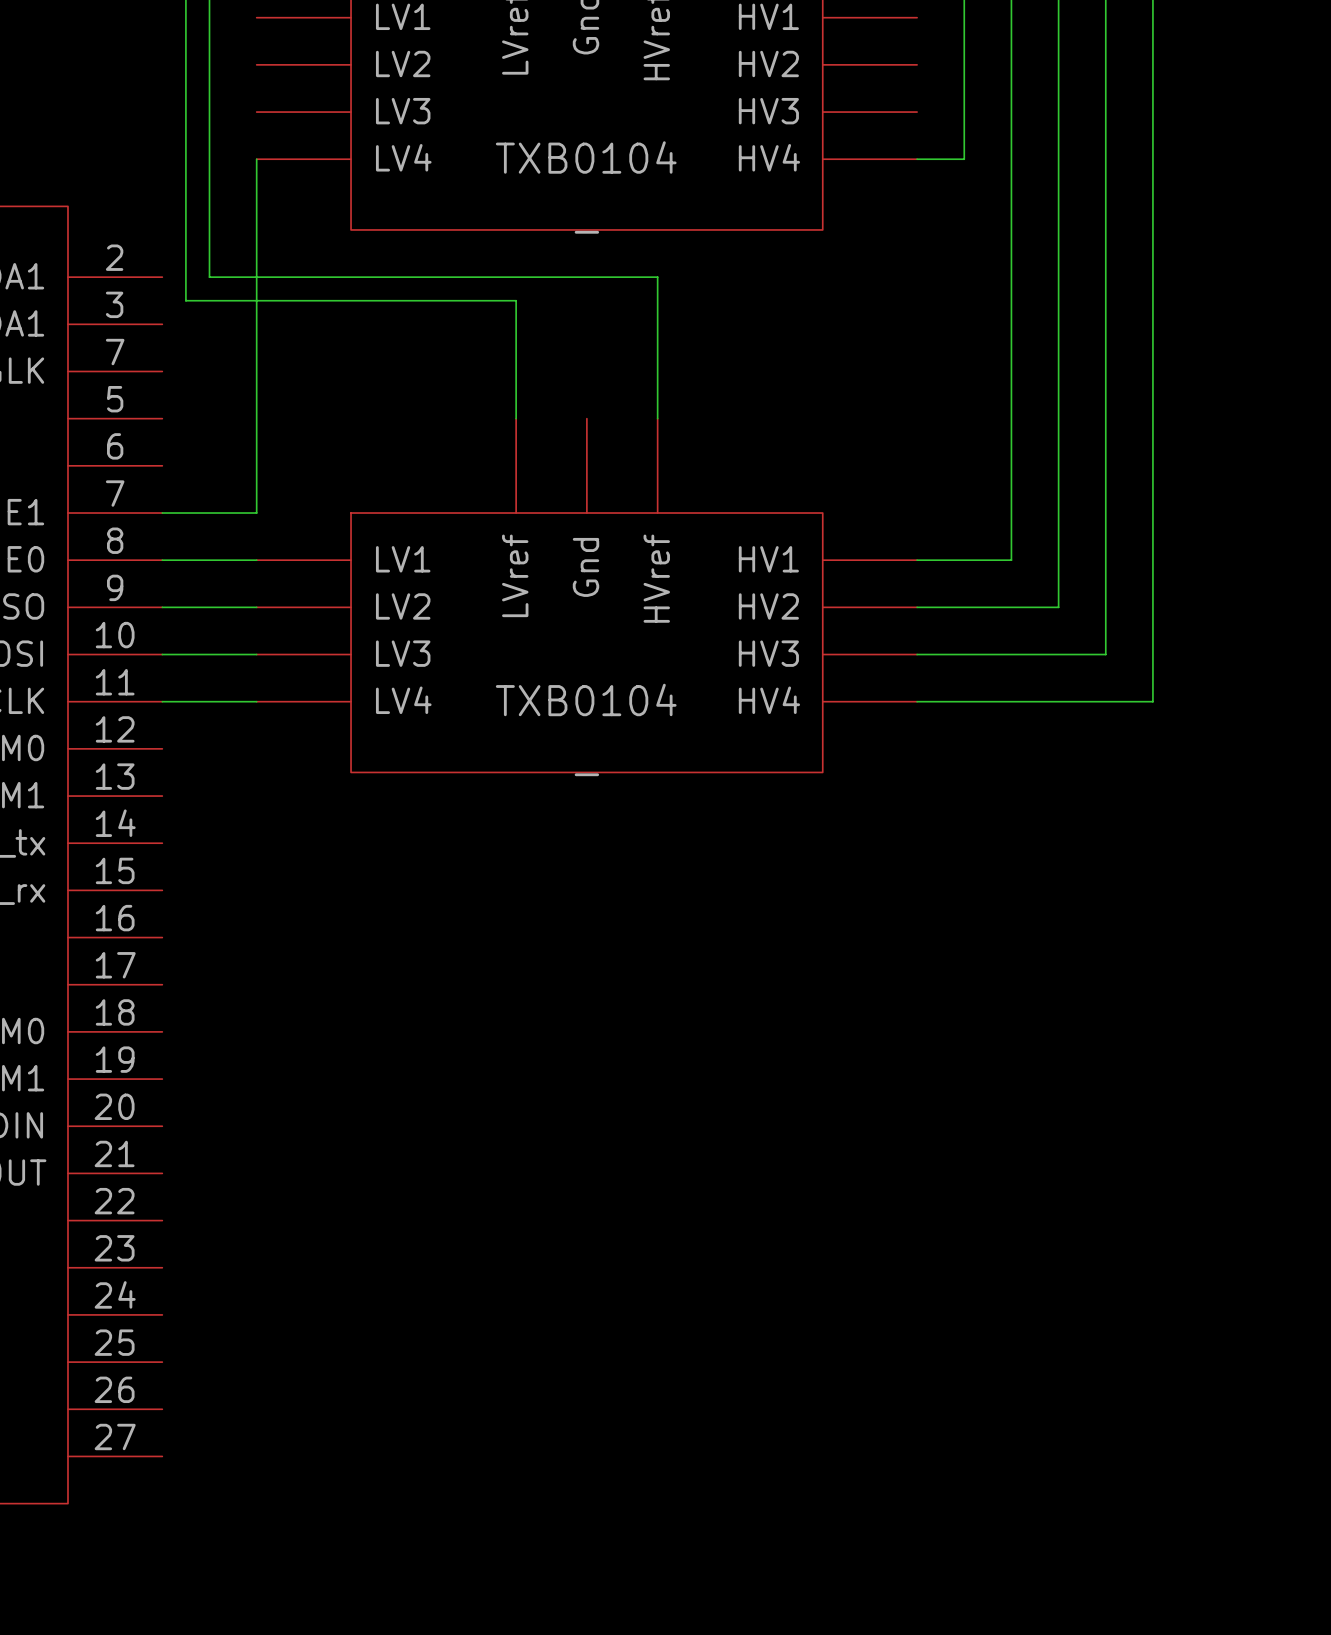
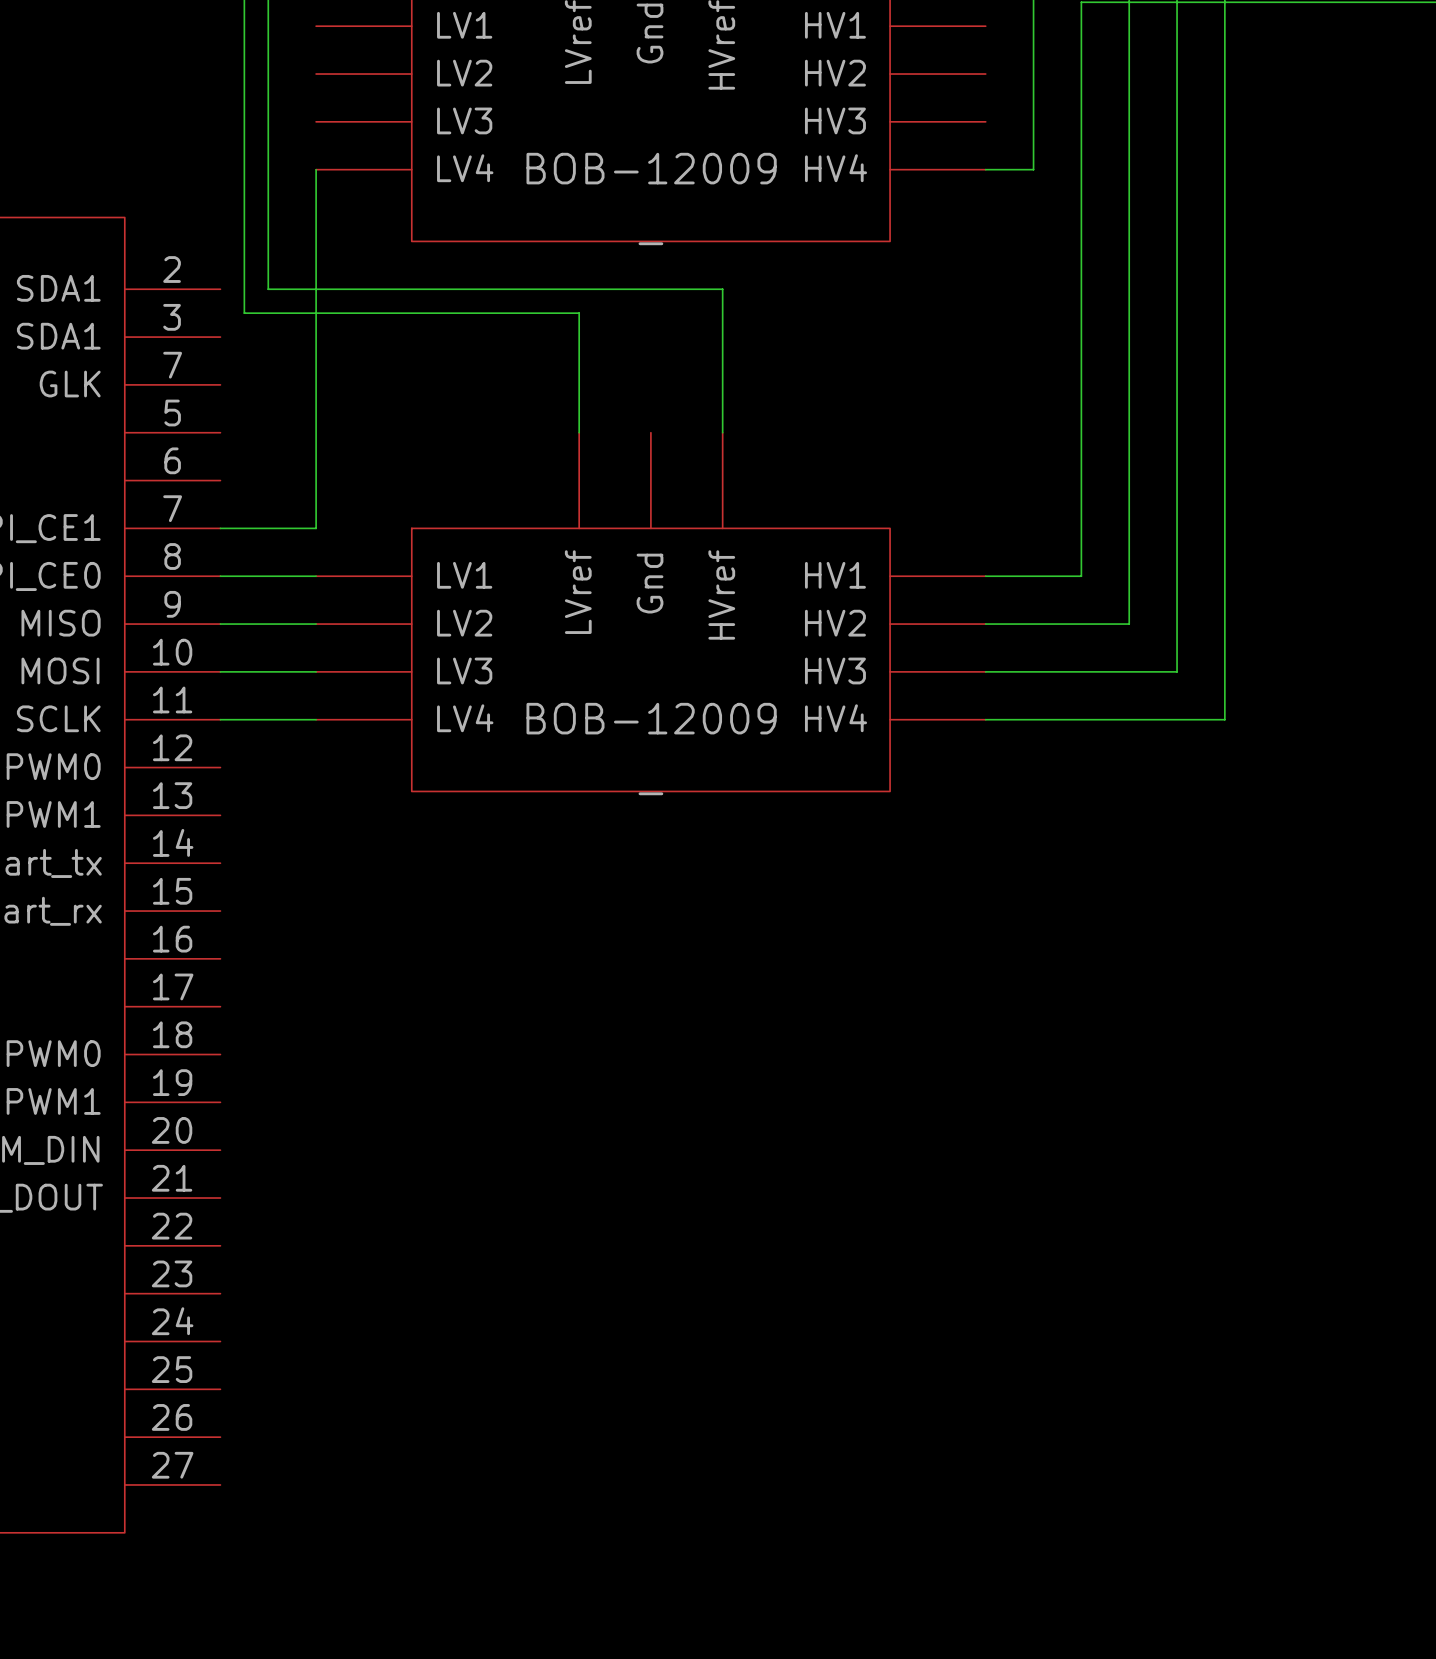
part value: TXB0104 (586, 157) -> BOB-12009 (651, 168)
part value: TXB0104 (586, 699) -> BOB-12009 (651, 718)

